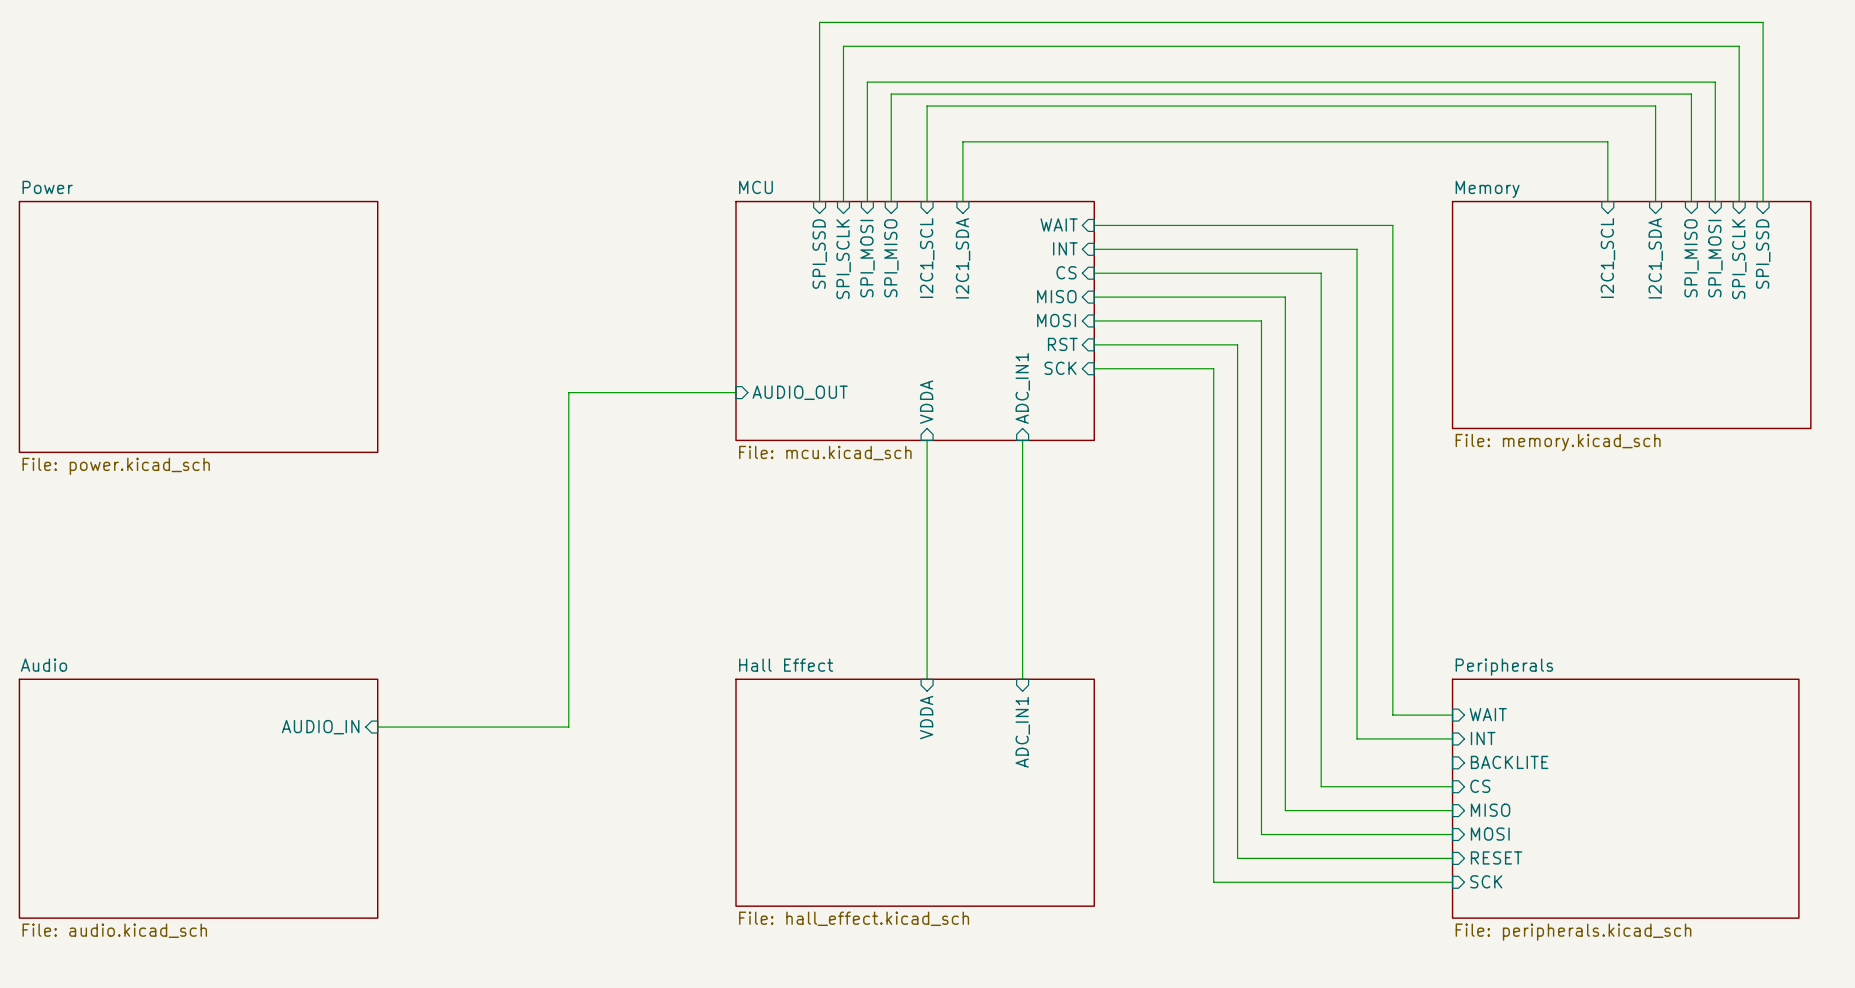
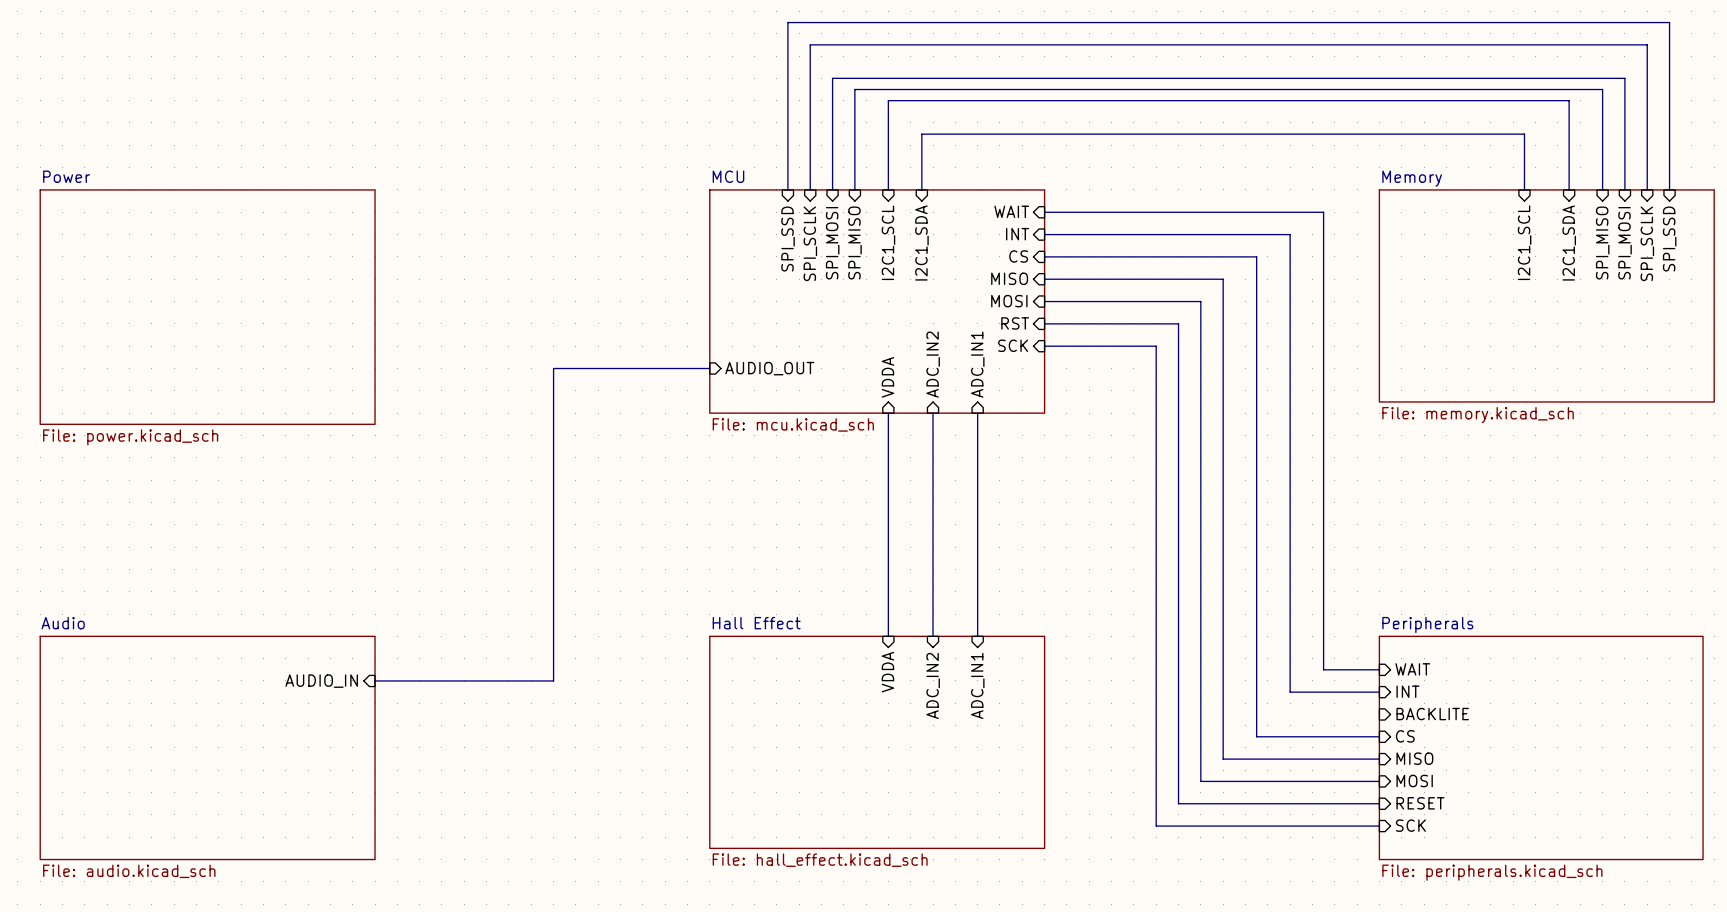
sheet pin: none -> ADC_IN2 (933, 364)
wire: none -> (933, 413) (933, 636)
sheet pin: none -> ADC_IN2 (933, 685)

